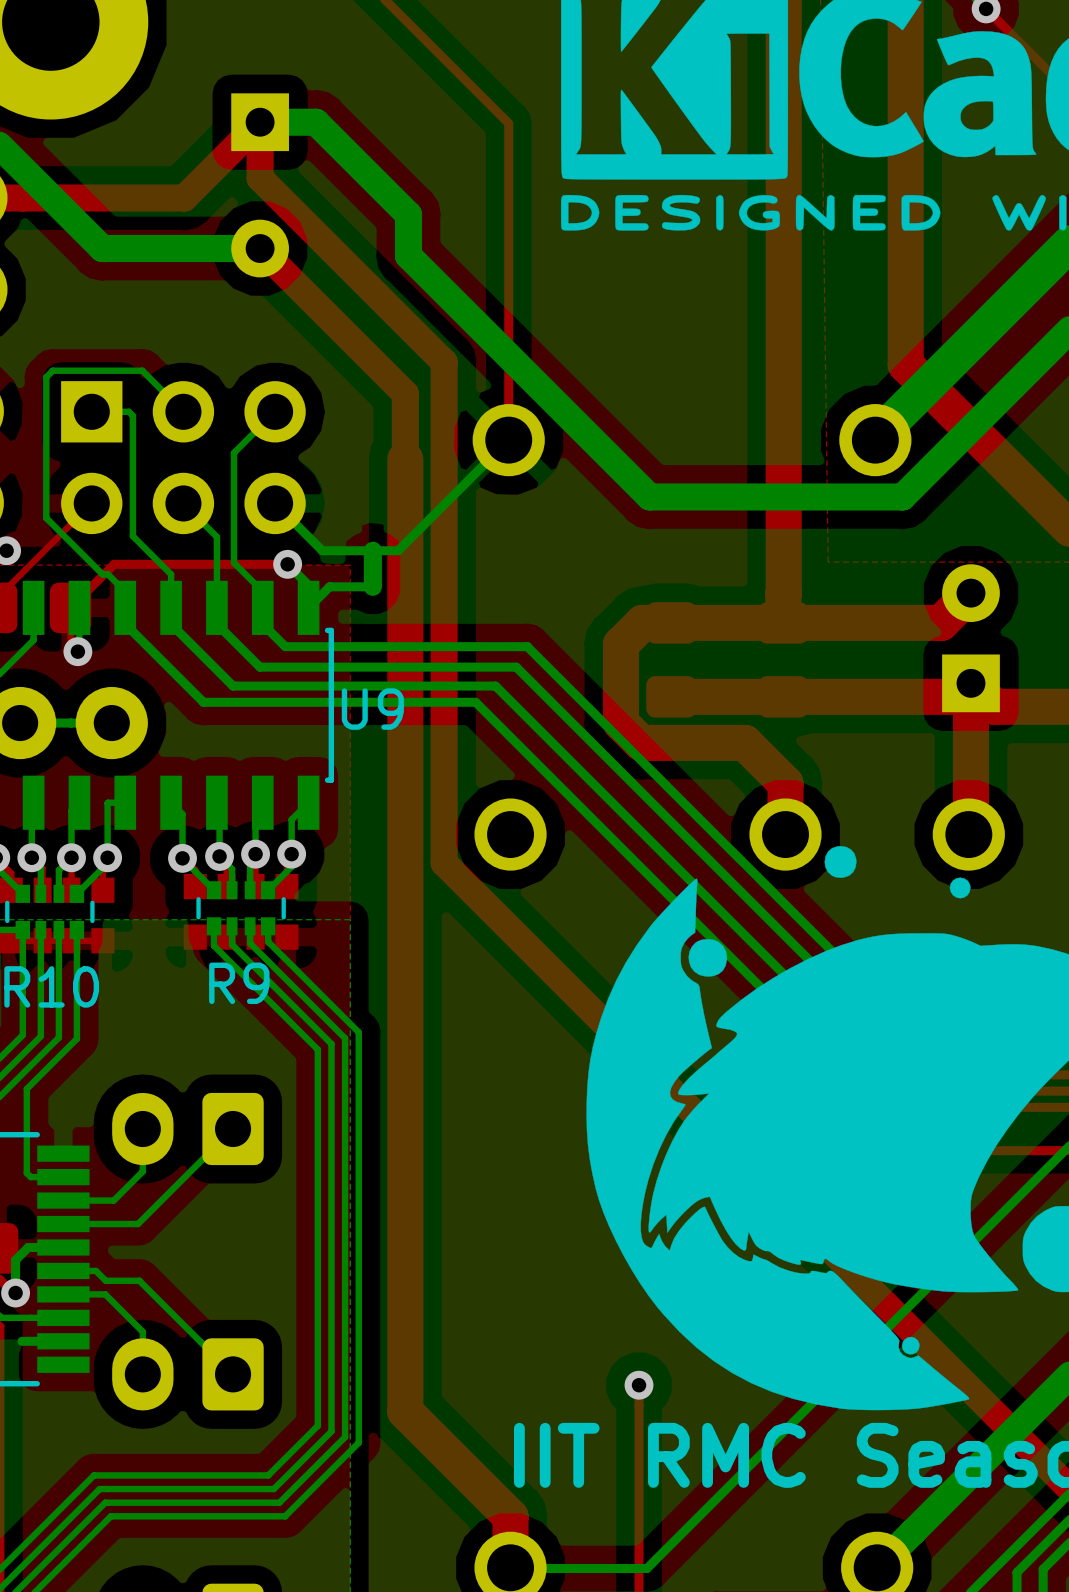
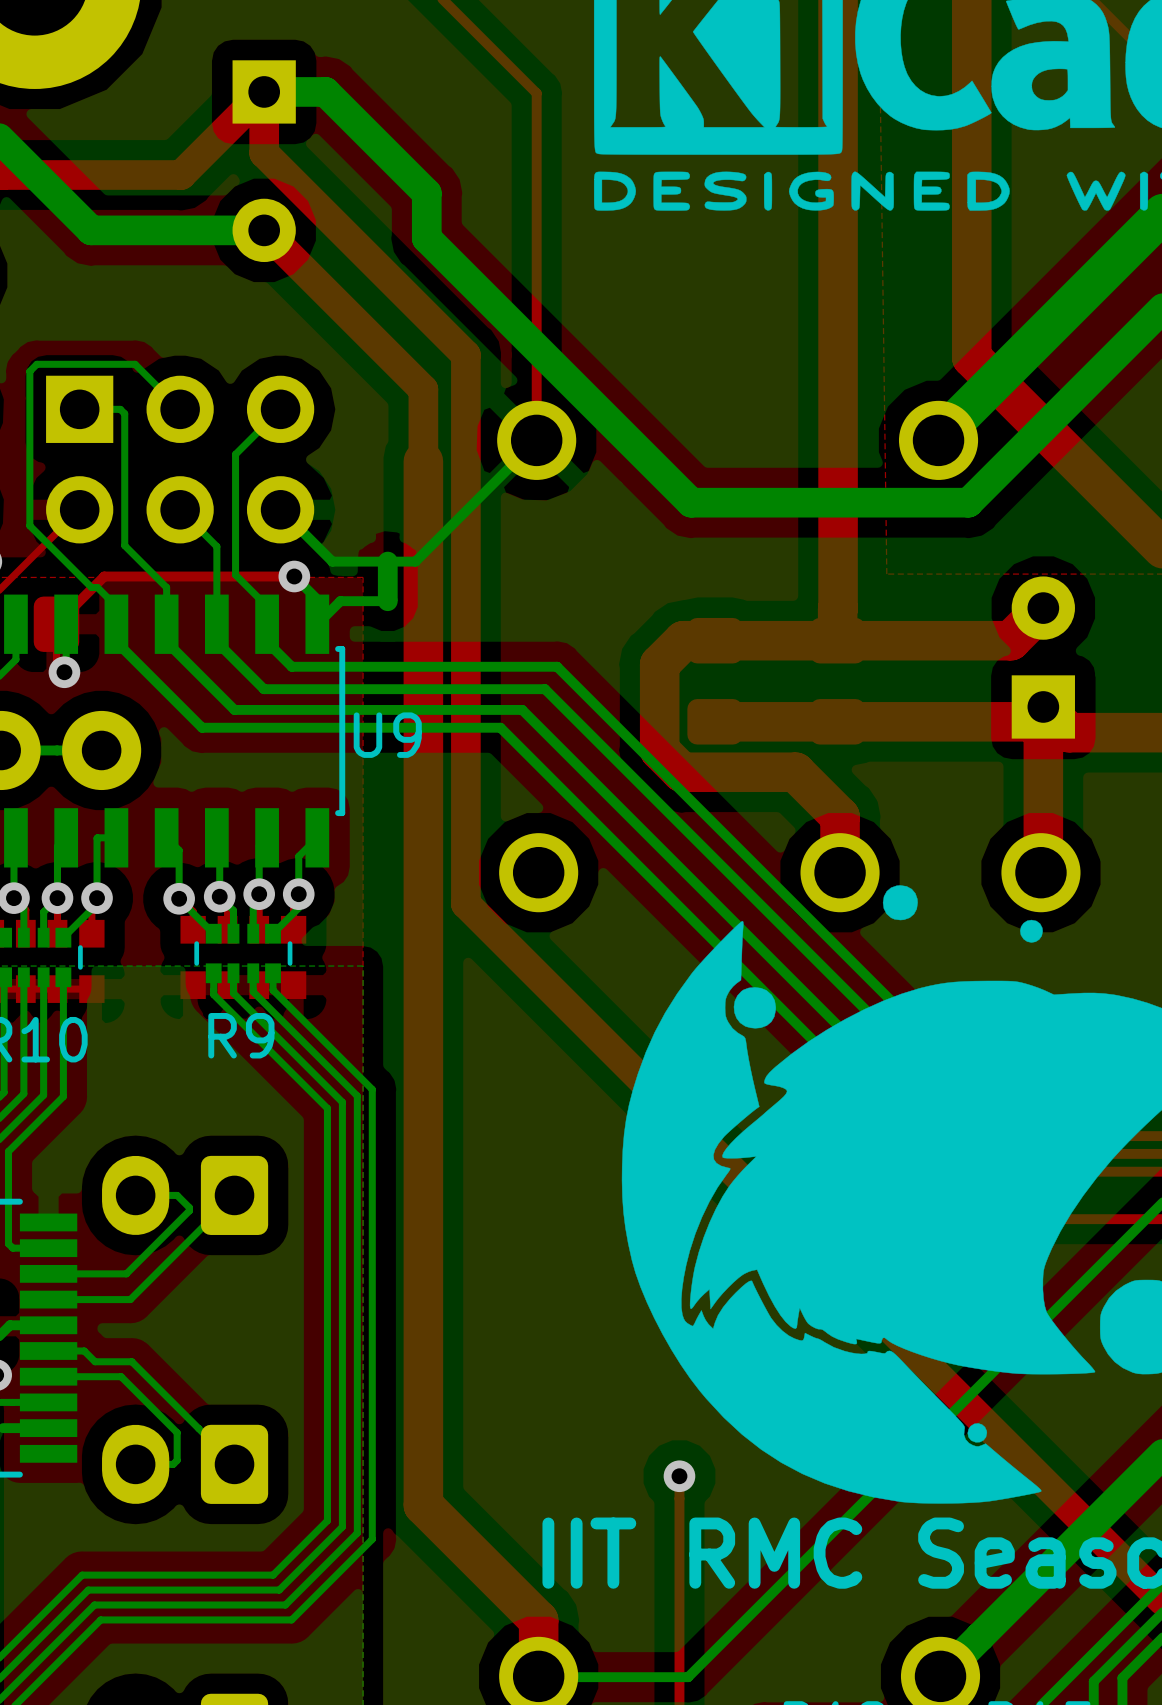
bottom track: (142, 1129) (142, 1171) (113, 1200) -> (135, 1195) (177, 1195) (189, 1207) (189, 1210) (126, 1273) (103, 1273)
bottom track: (105, 1294) (142, 1331) (142, 1374) -> (94, 1376) (121, 1376) (177, 1432) (177, 1460) (173, 1464) (135, 1464)

